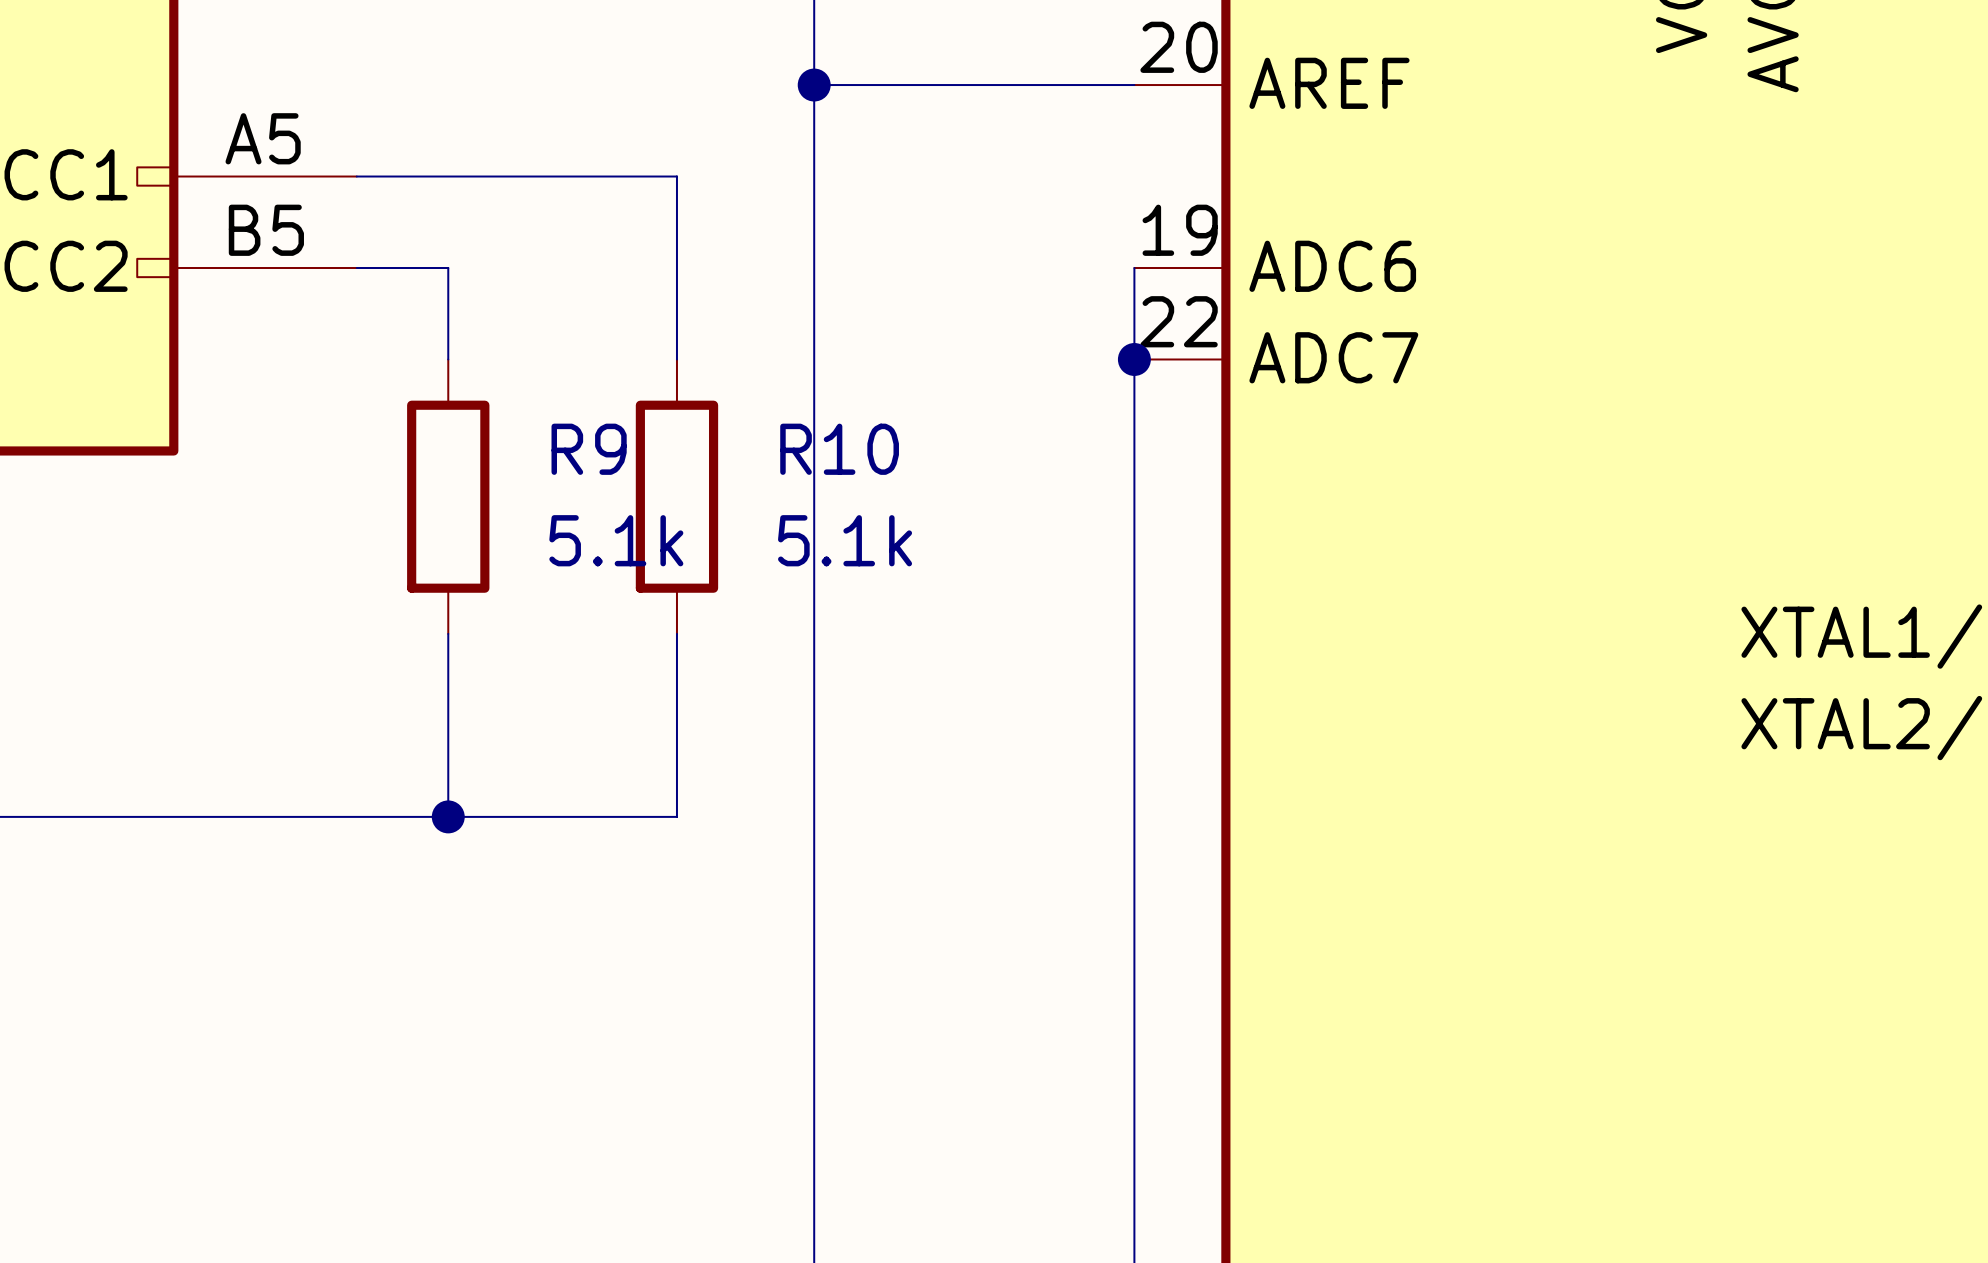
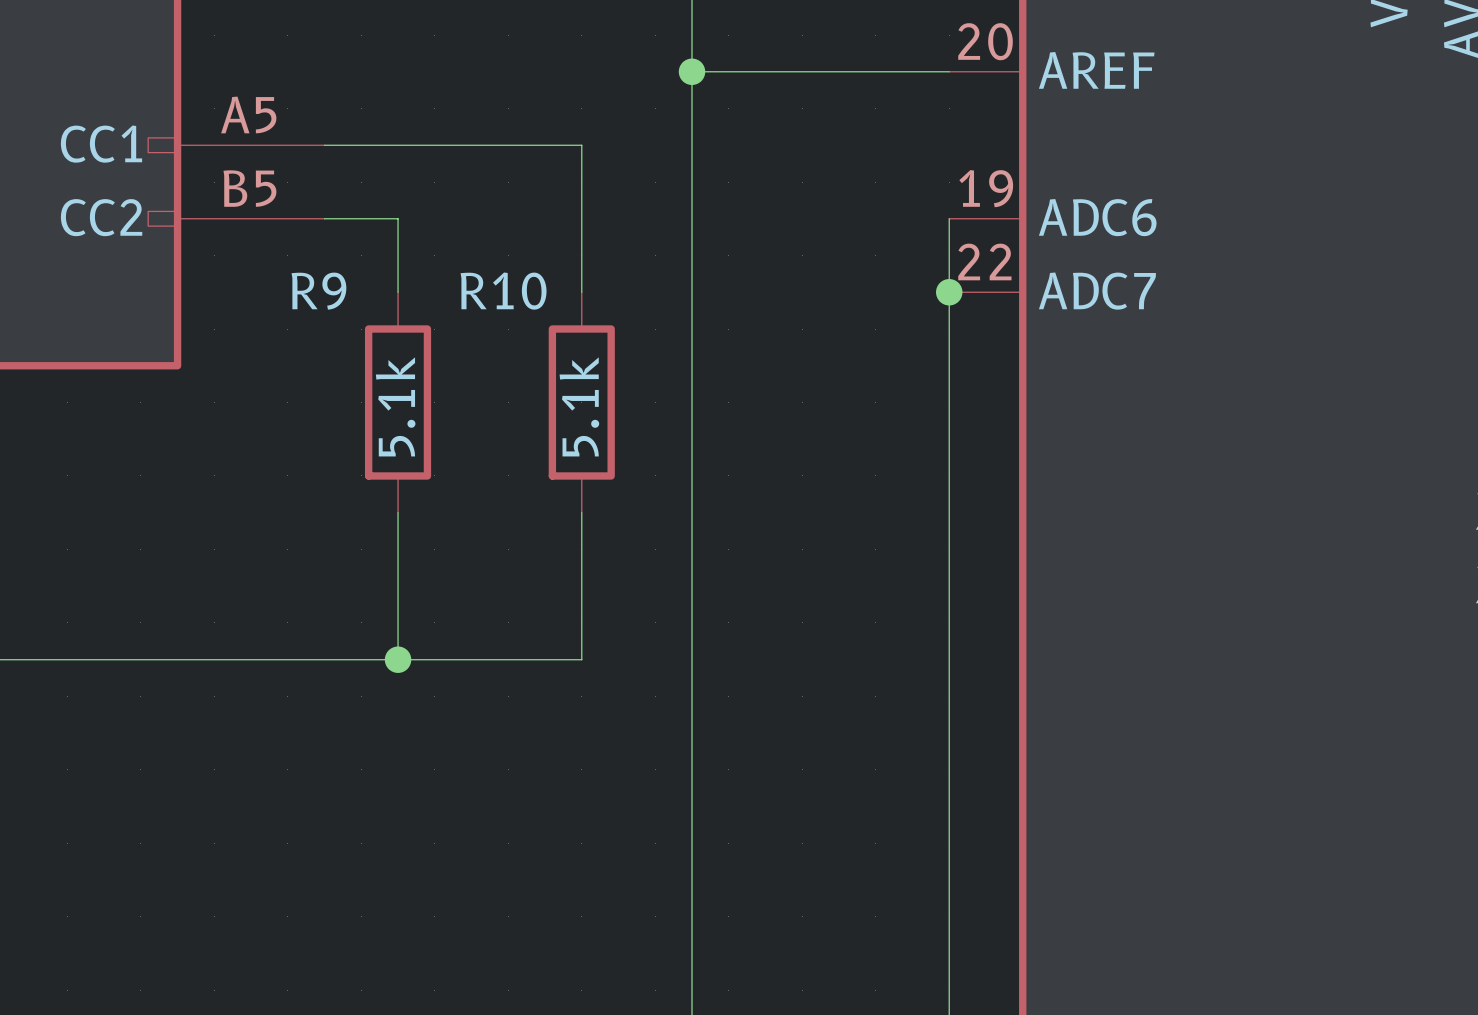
R9 name position: R9 (589, 449) -> R9 (318, 291)
R10 name position: R10 (839, 449) -> R10 (503, 291)
R9 value rotation: 0° (616, 540) -> 90° counterclockwise (395, 406)
R9 value position: 5.1k (616, 540) -> 5.1k (395, 406)
R10 value rotation: 0° (845, 540) -> 90° counterclockwise (579, 406)
R10 value position: 5.1k (845, 540) -> 5.1k (579, 406)

